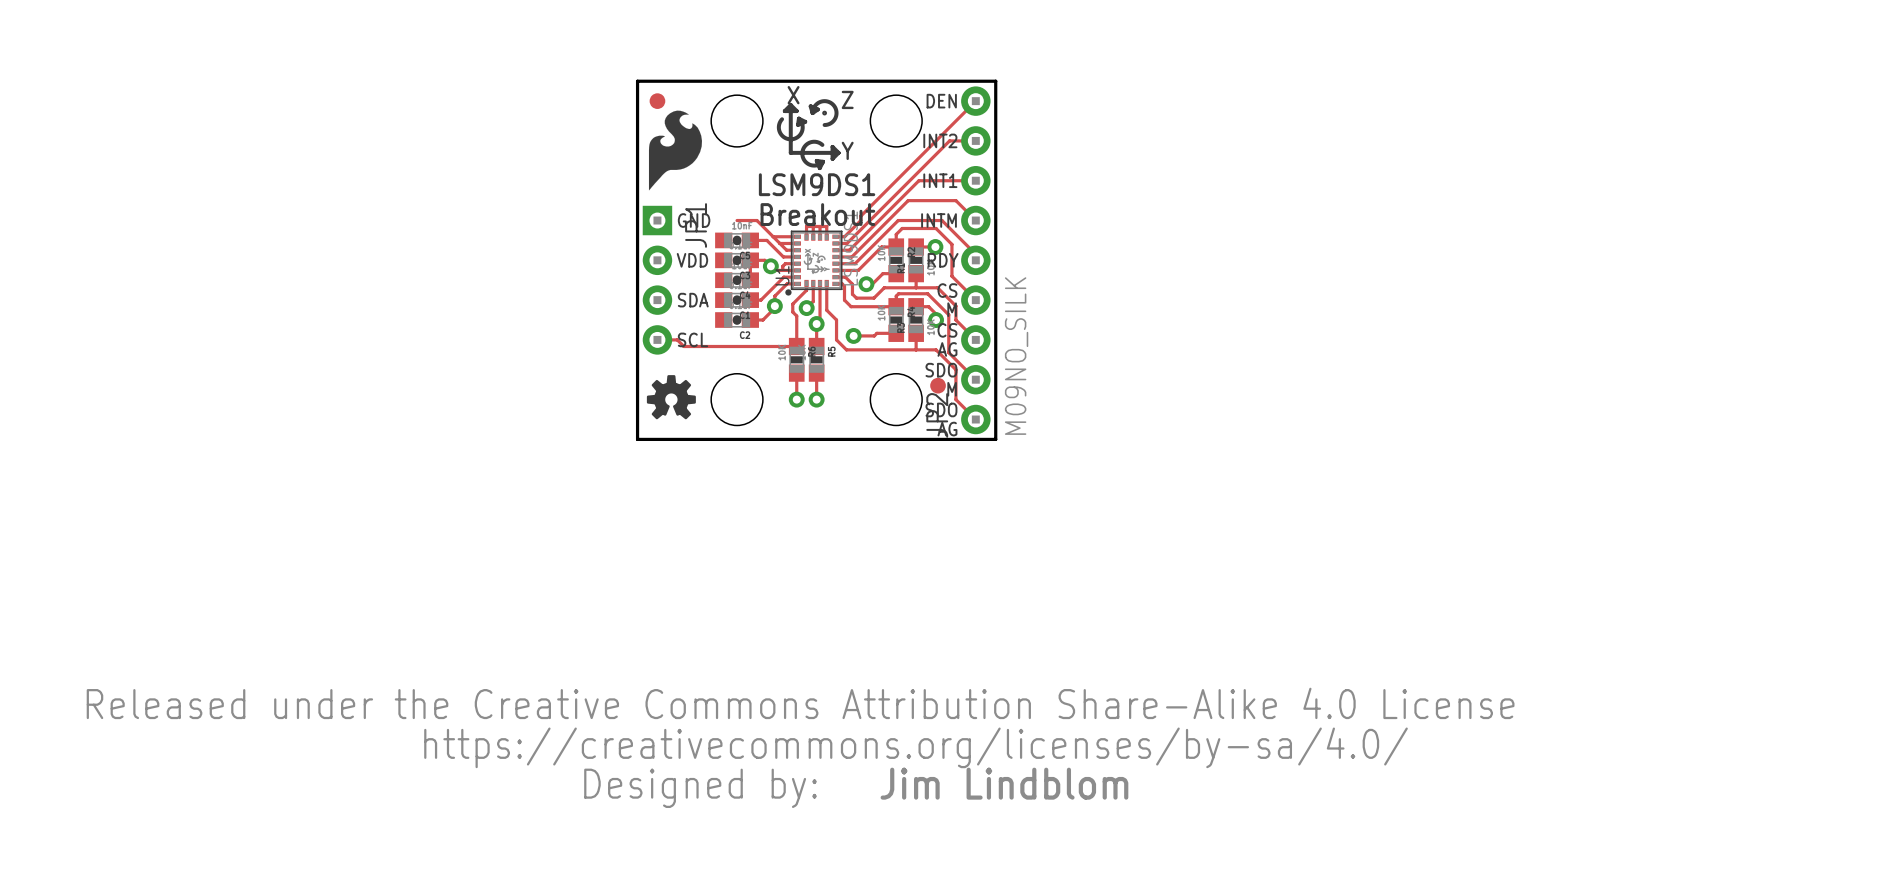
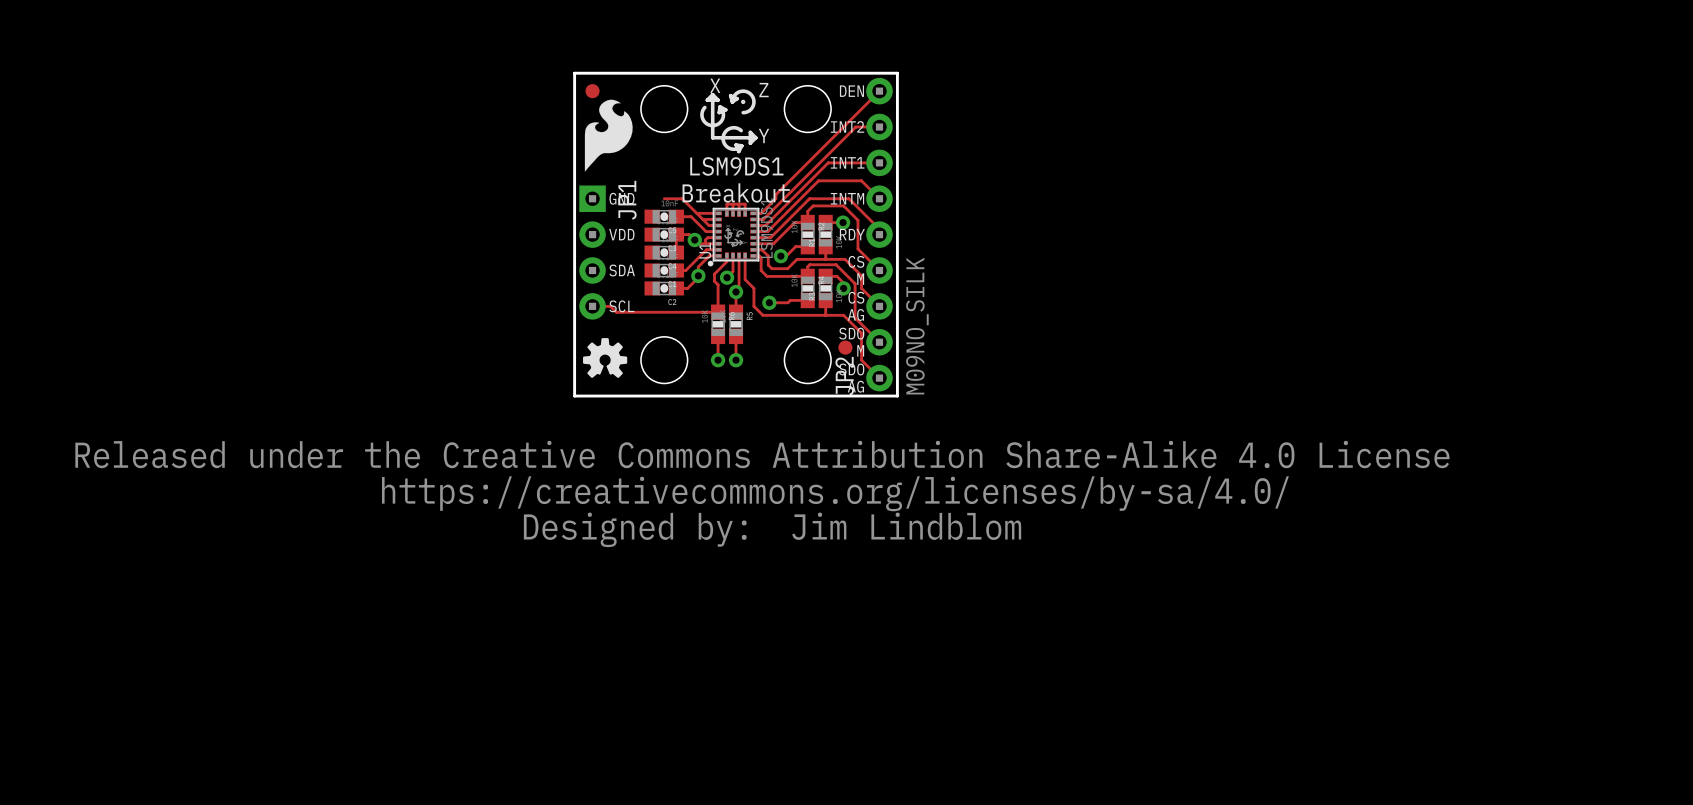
drawing position: (800, 747) -> (762, 494)

